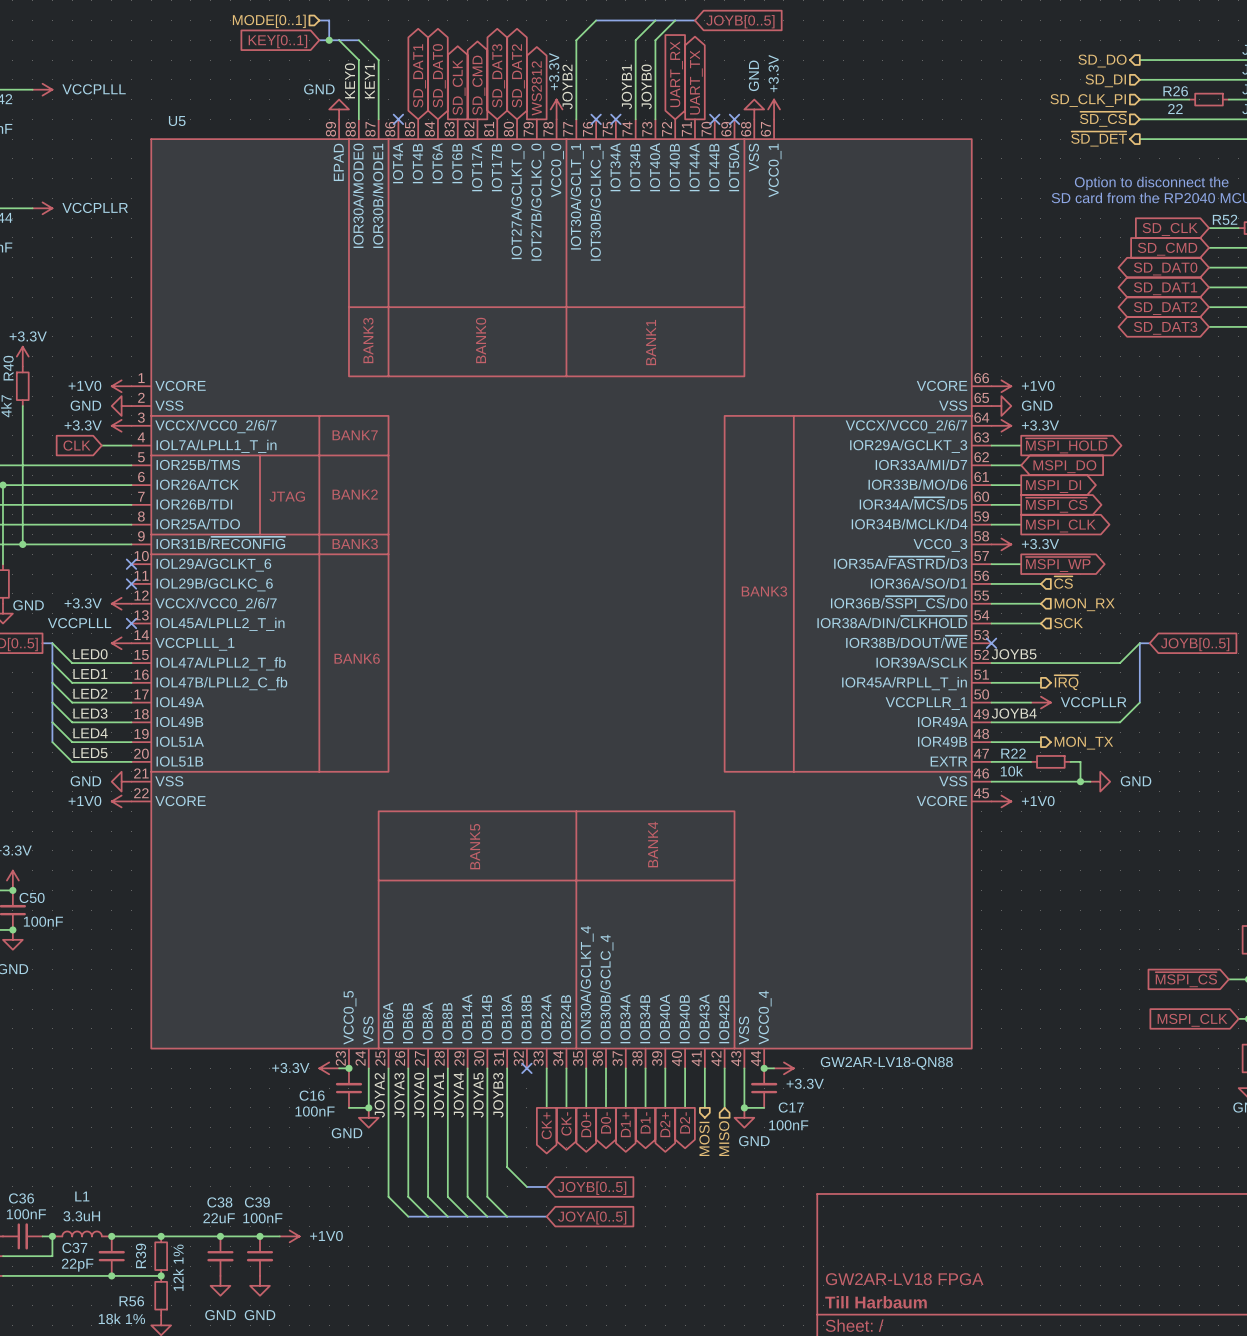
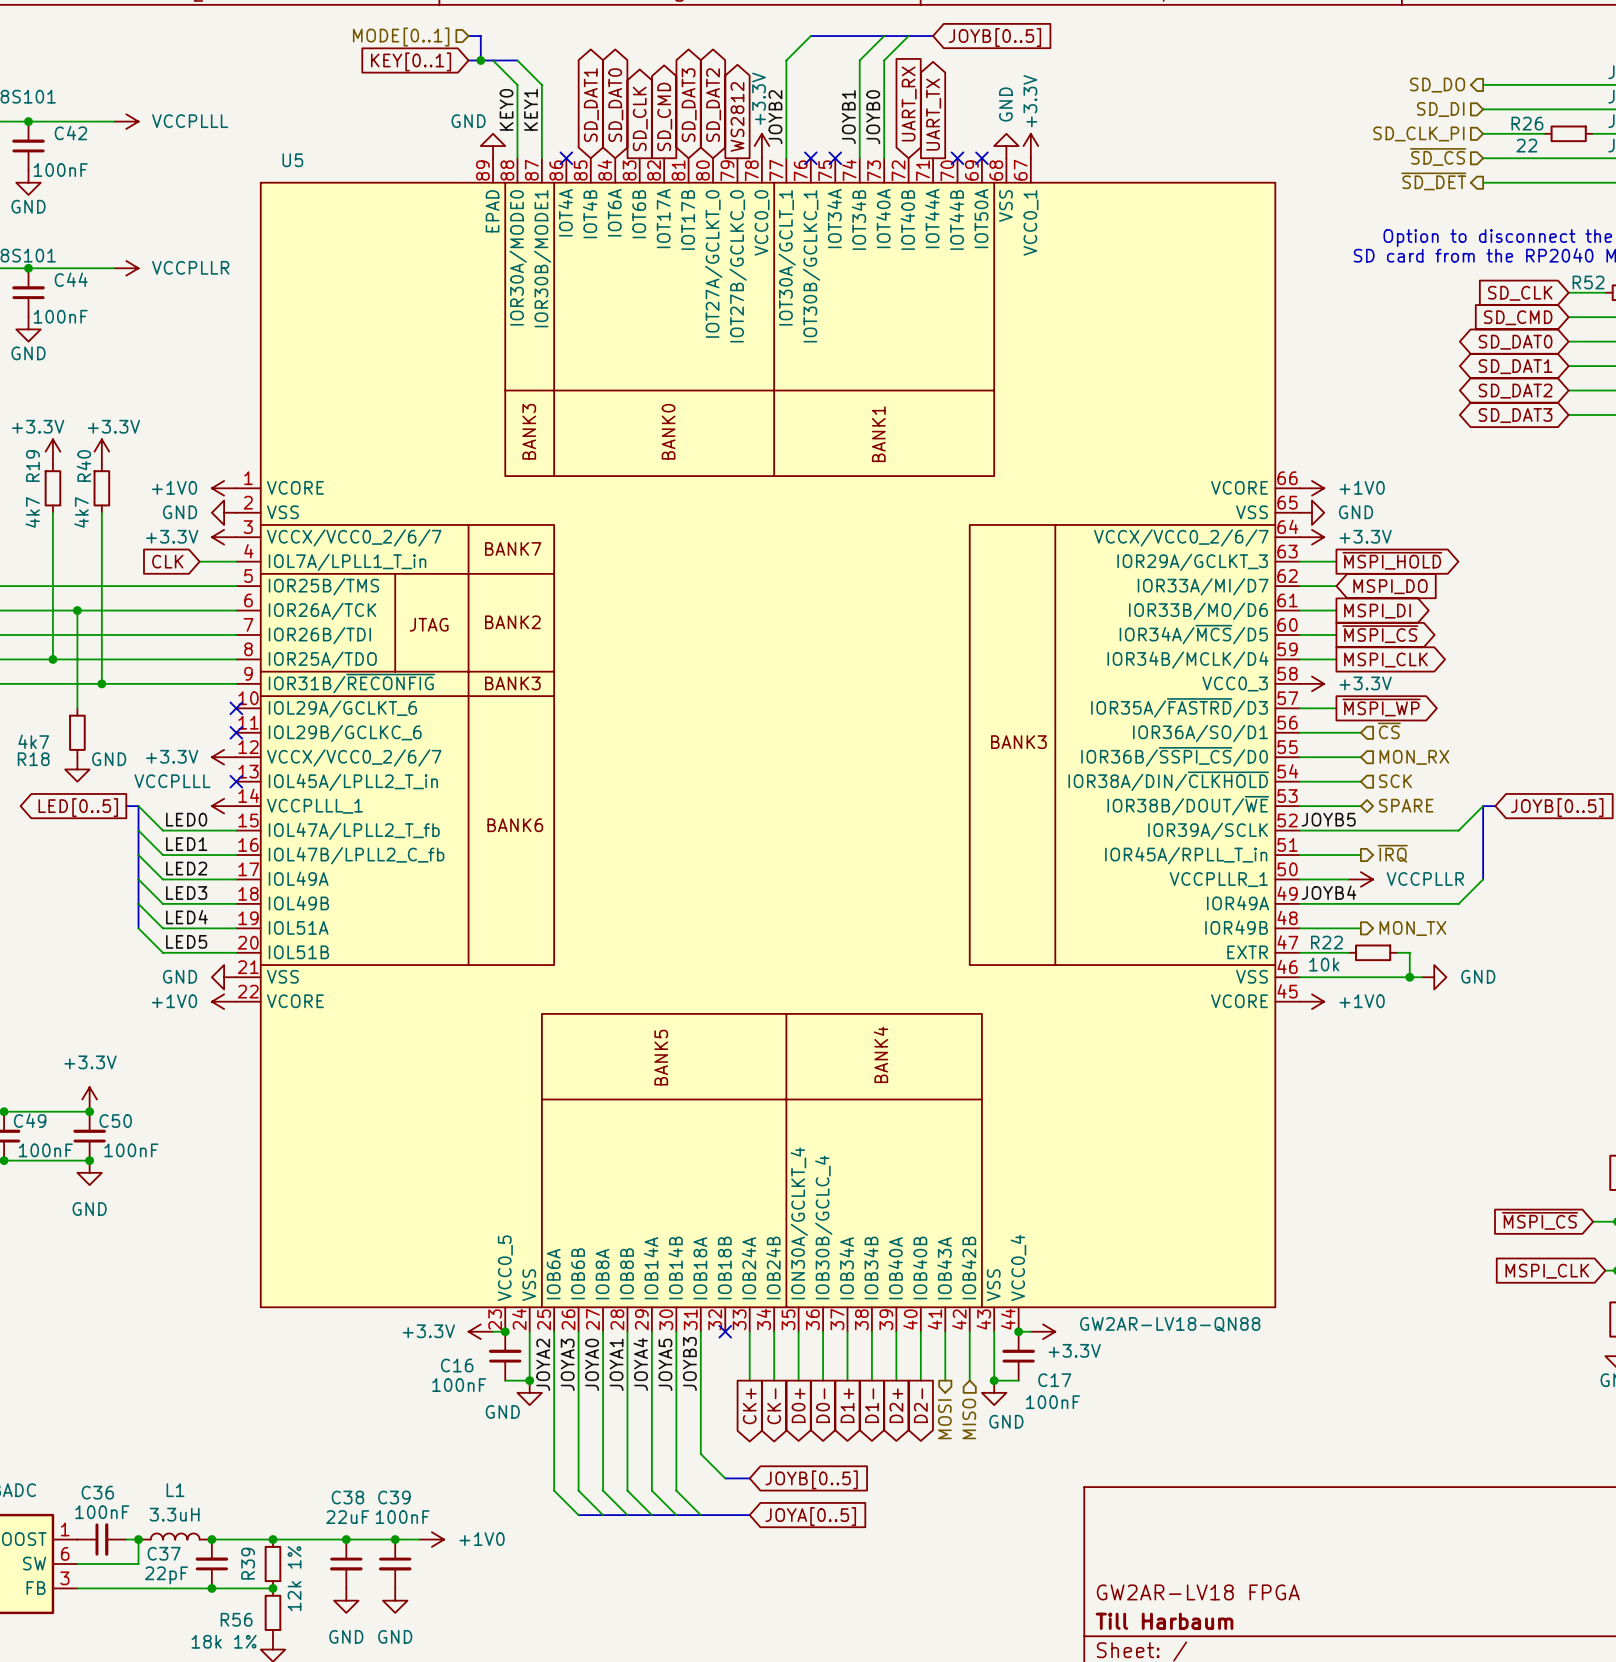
hierarchical label: none -> SPARE (1406, 805)
wire: none -> (1299, 806) (1360, 806)
no-connect mark: (991, 643) -> none

